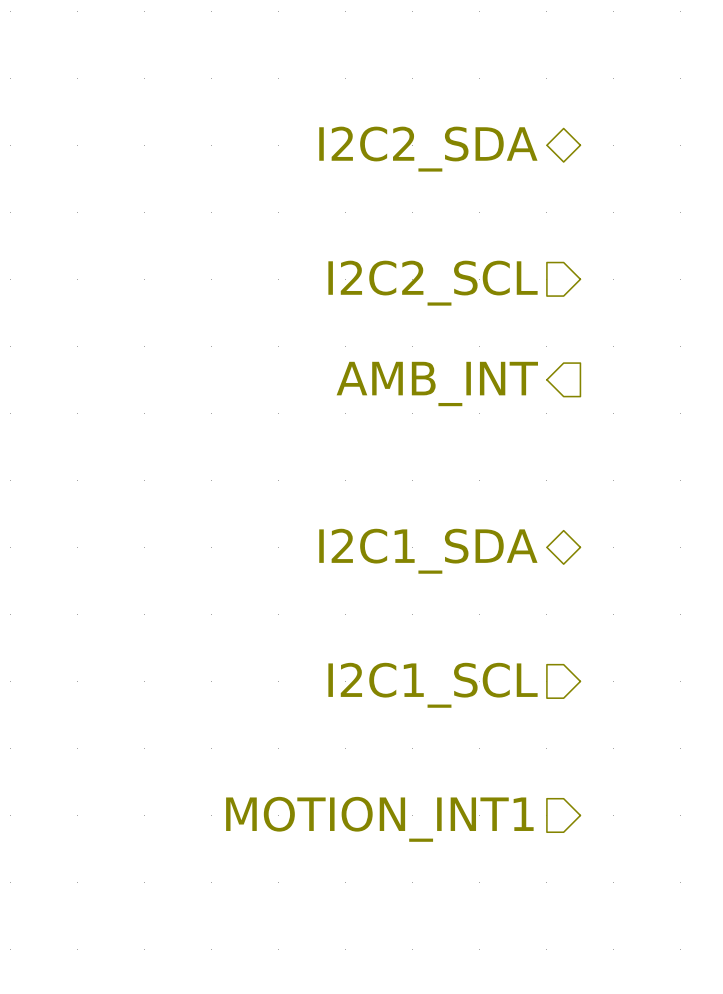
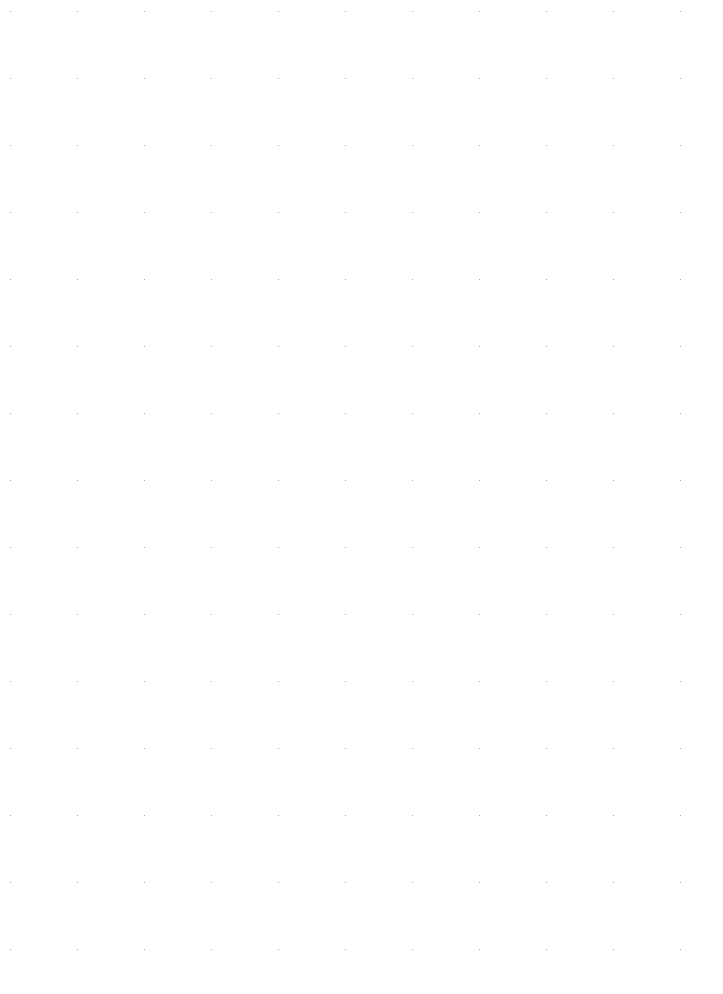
hierarchical label: I2C2_SDA (428, 149) -> none
hierarchical label: I2C2_SCL (433, 283) -> none
hierarchical label: AMB_INT (437, 383) -> none
hierarchical label: I2C1_SDA (428, 551) -> none
hierarchical label: I2C1_SCL (433, 685) -> none
hierarchical label: MOTION_INT1 (379, 819) -> none

